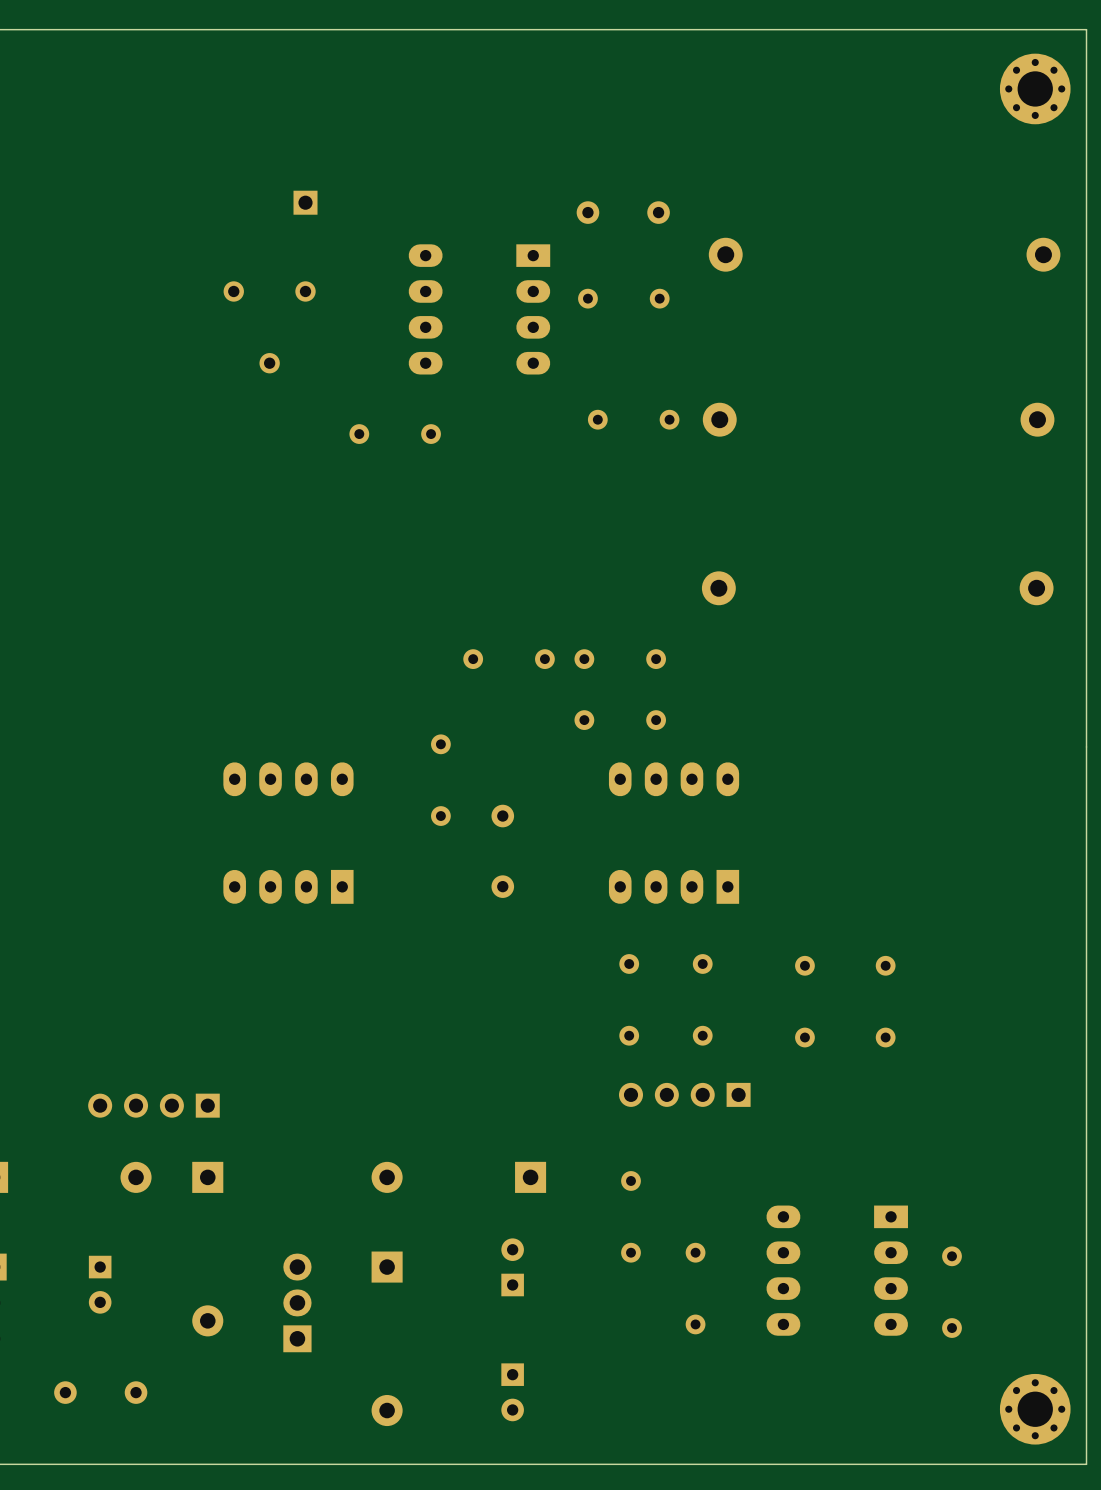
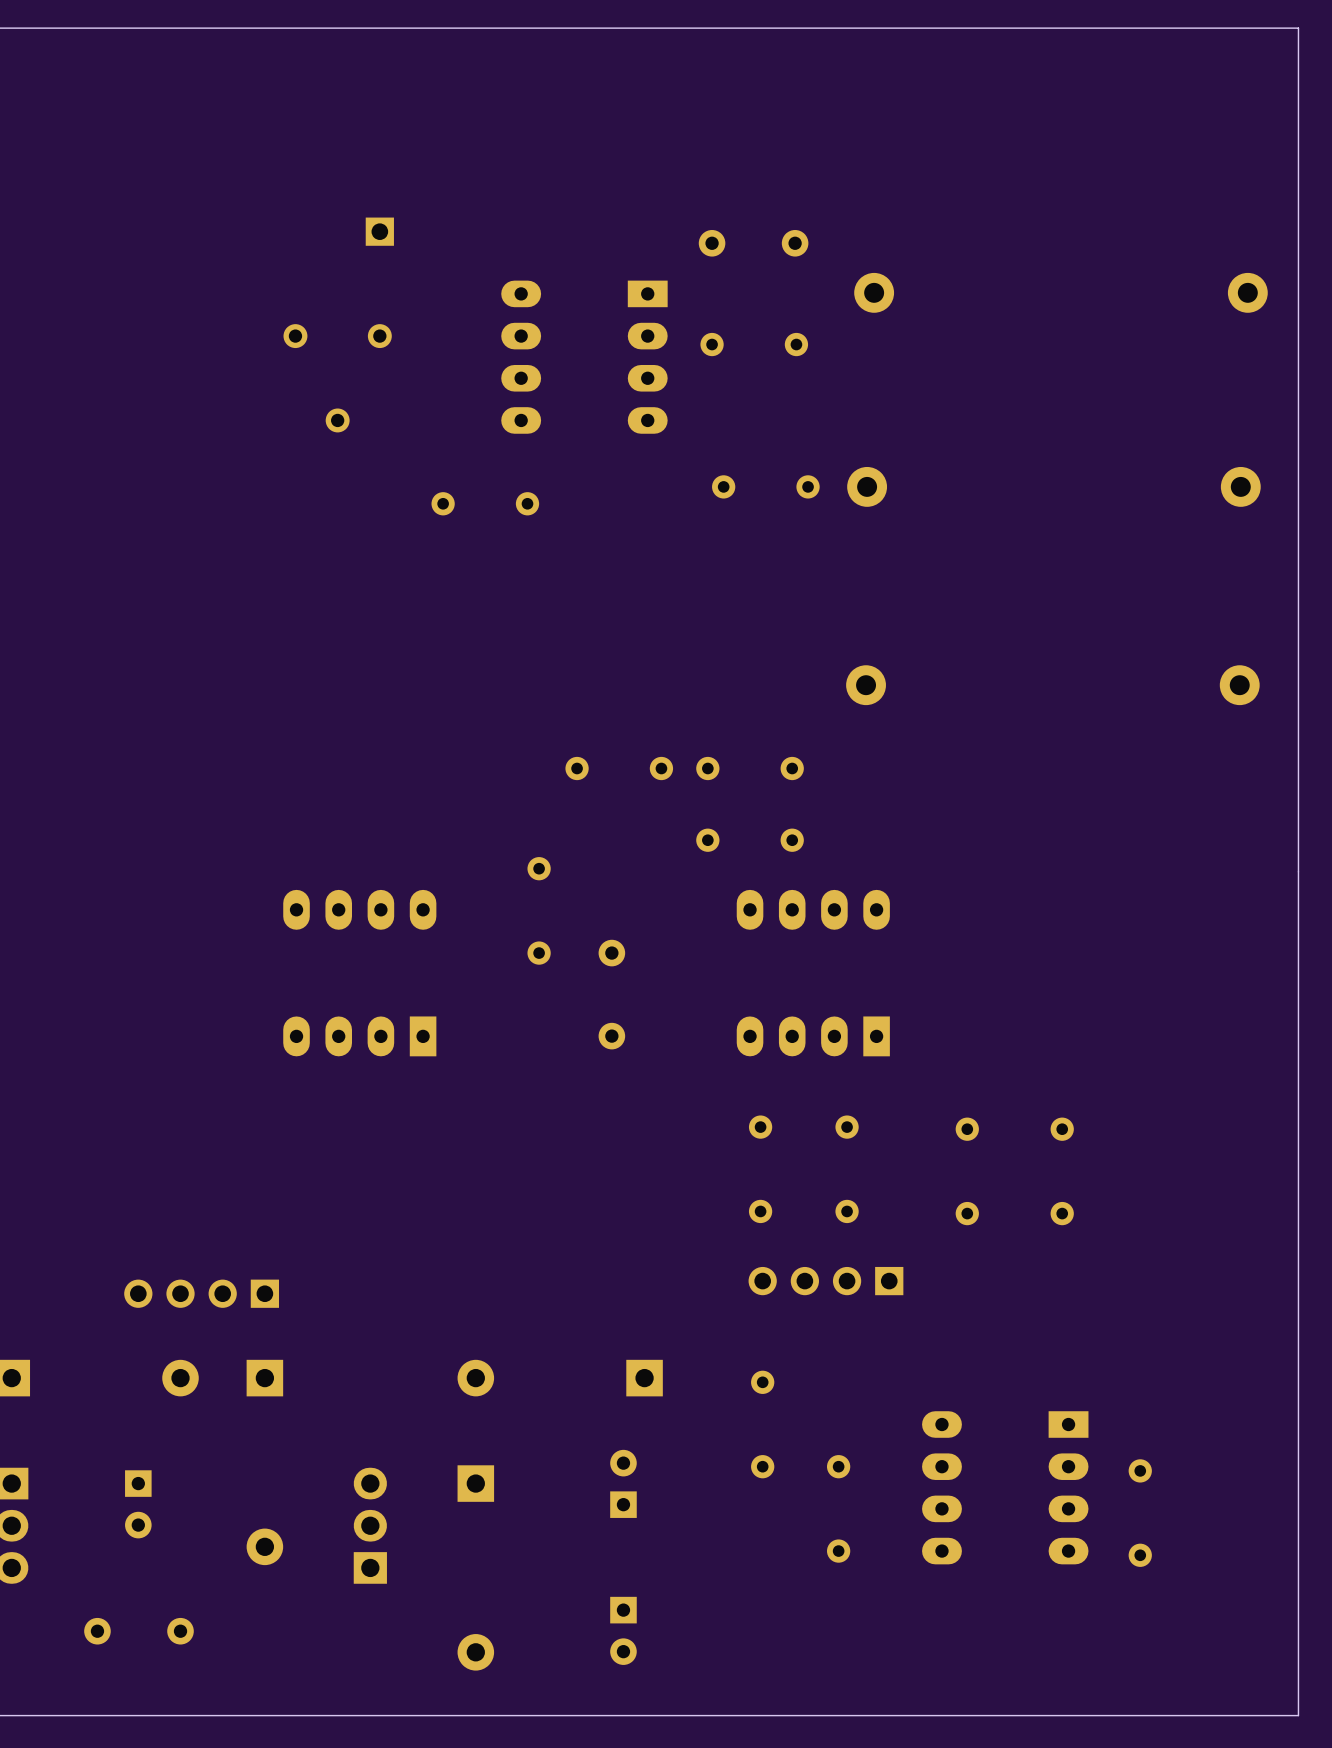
part: (1035, 88) -> none
part: (1035, 1409) -> none

